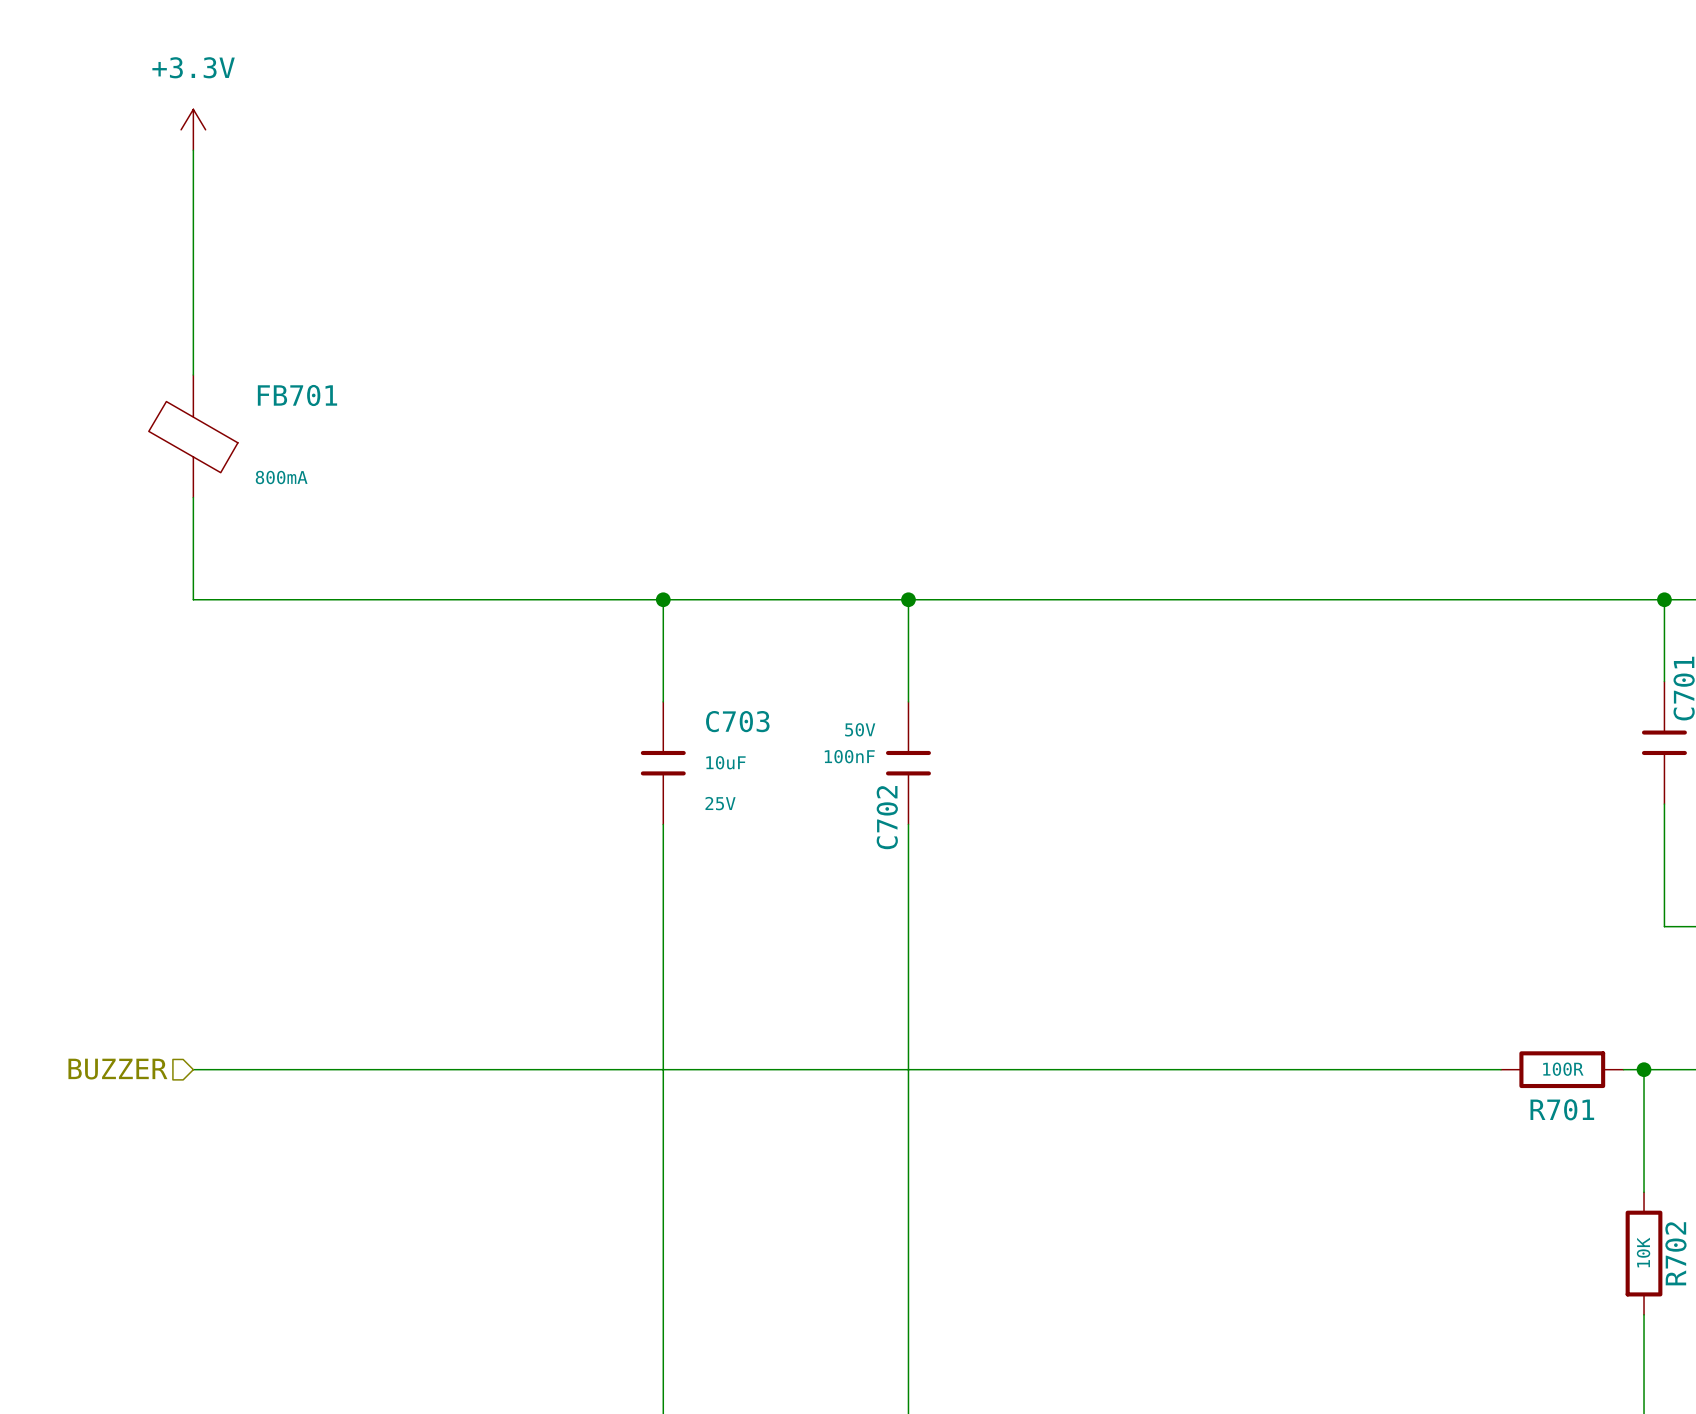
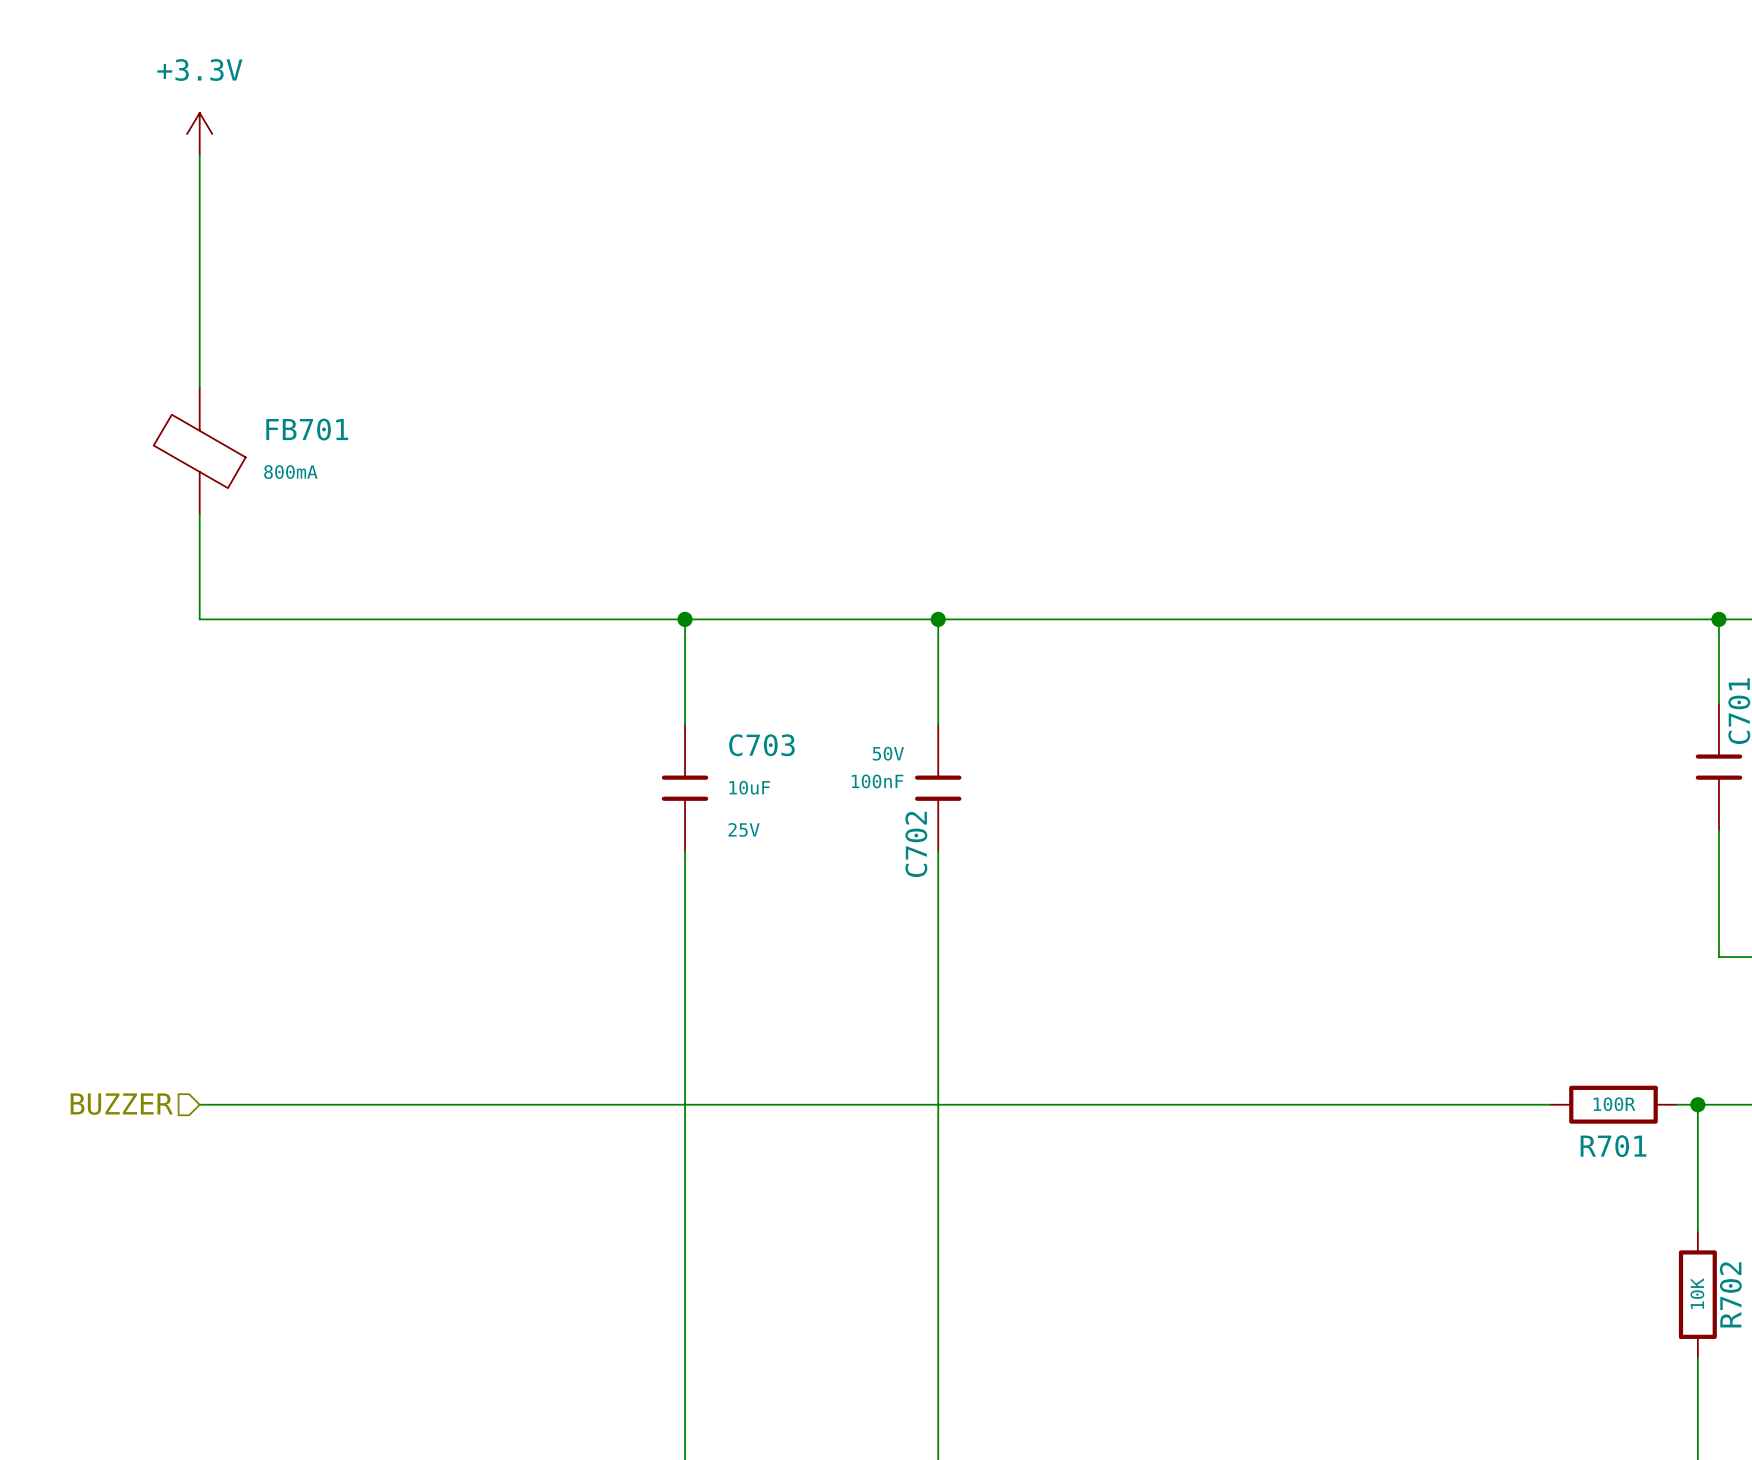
FB701 name position: FB701 (297, 395) -> FB701 (307, 429)
FB701 text position: 800mA (281, 477) -> 800mA (290, 472)

